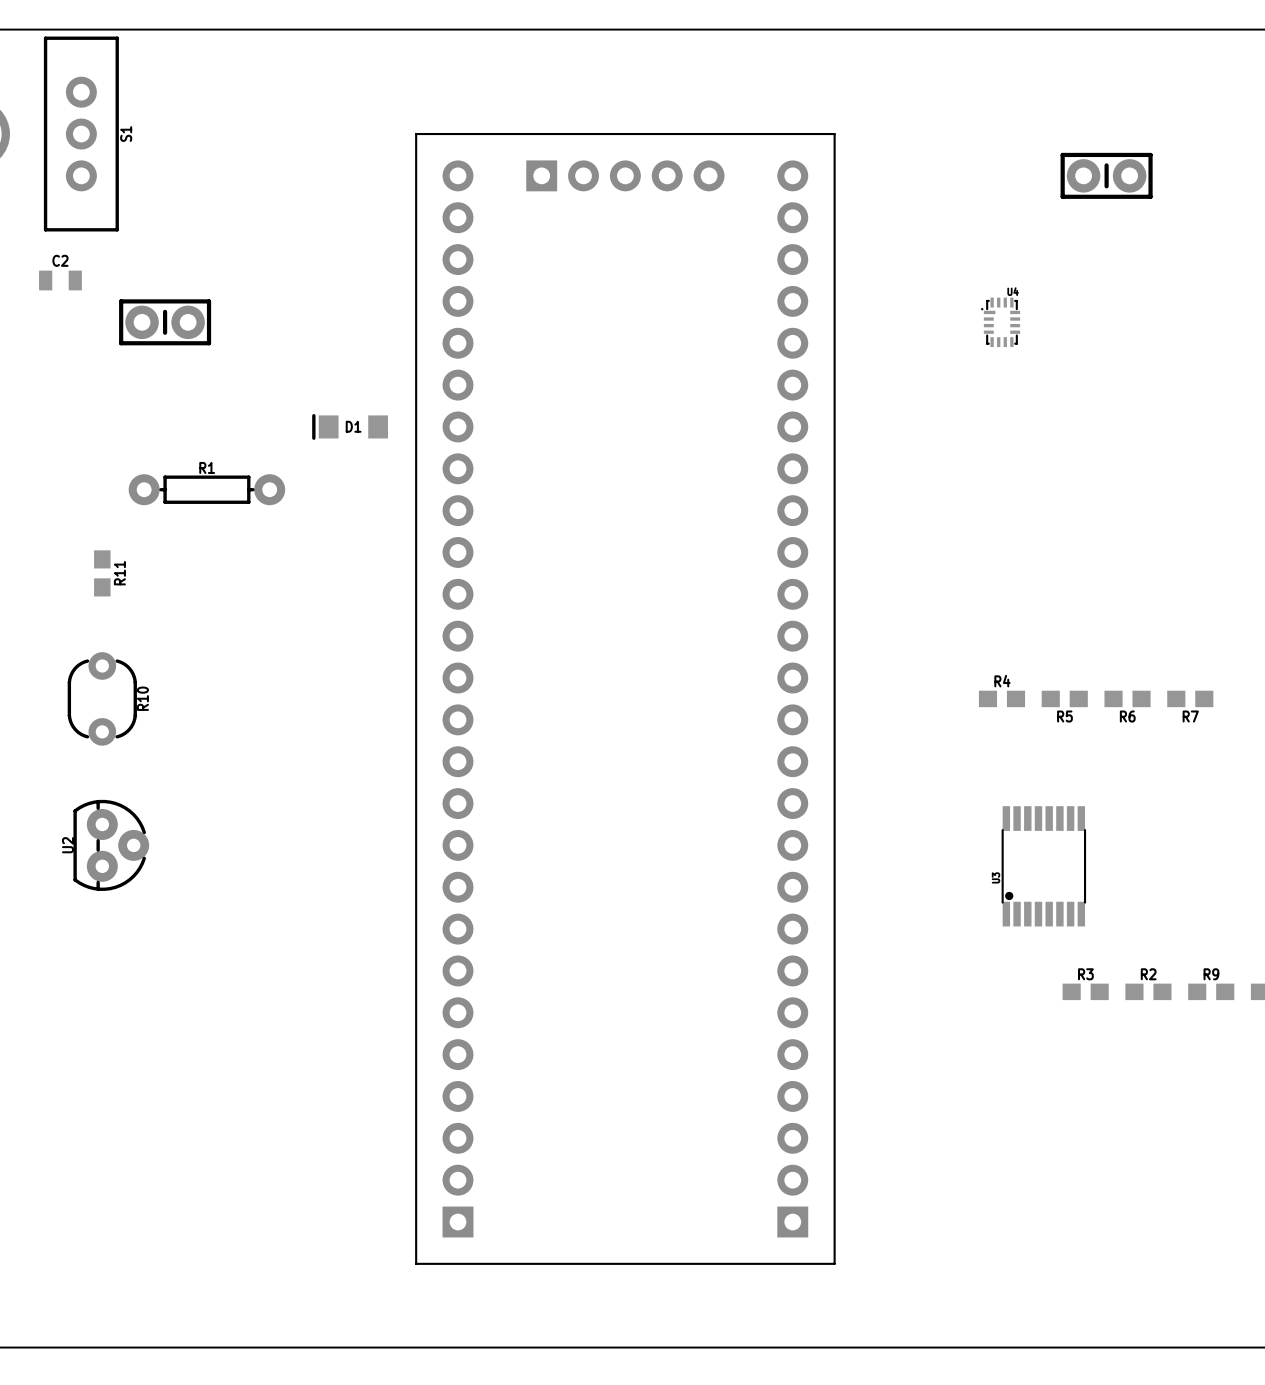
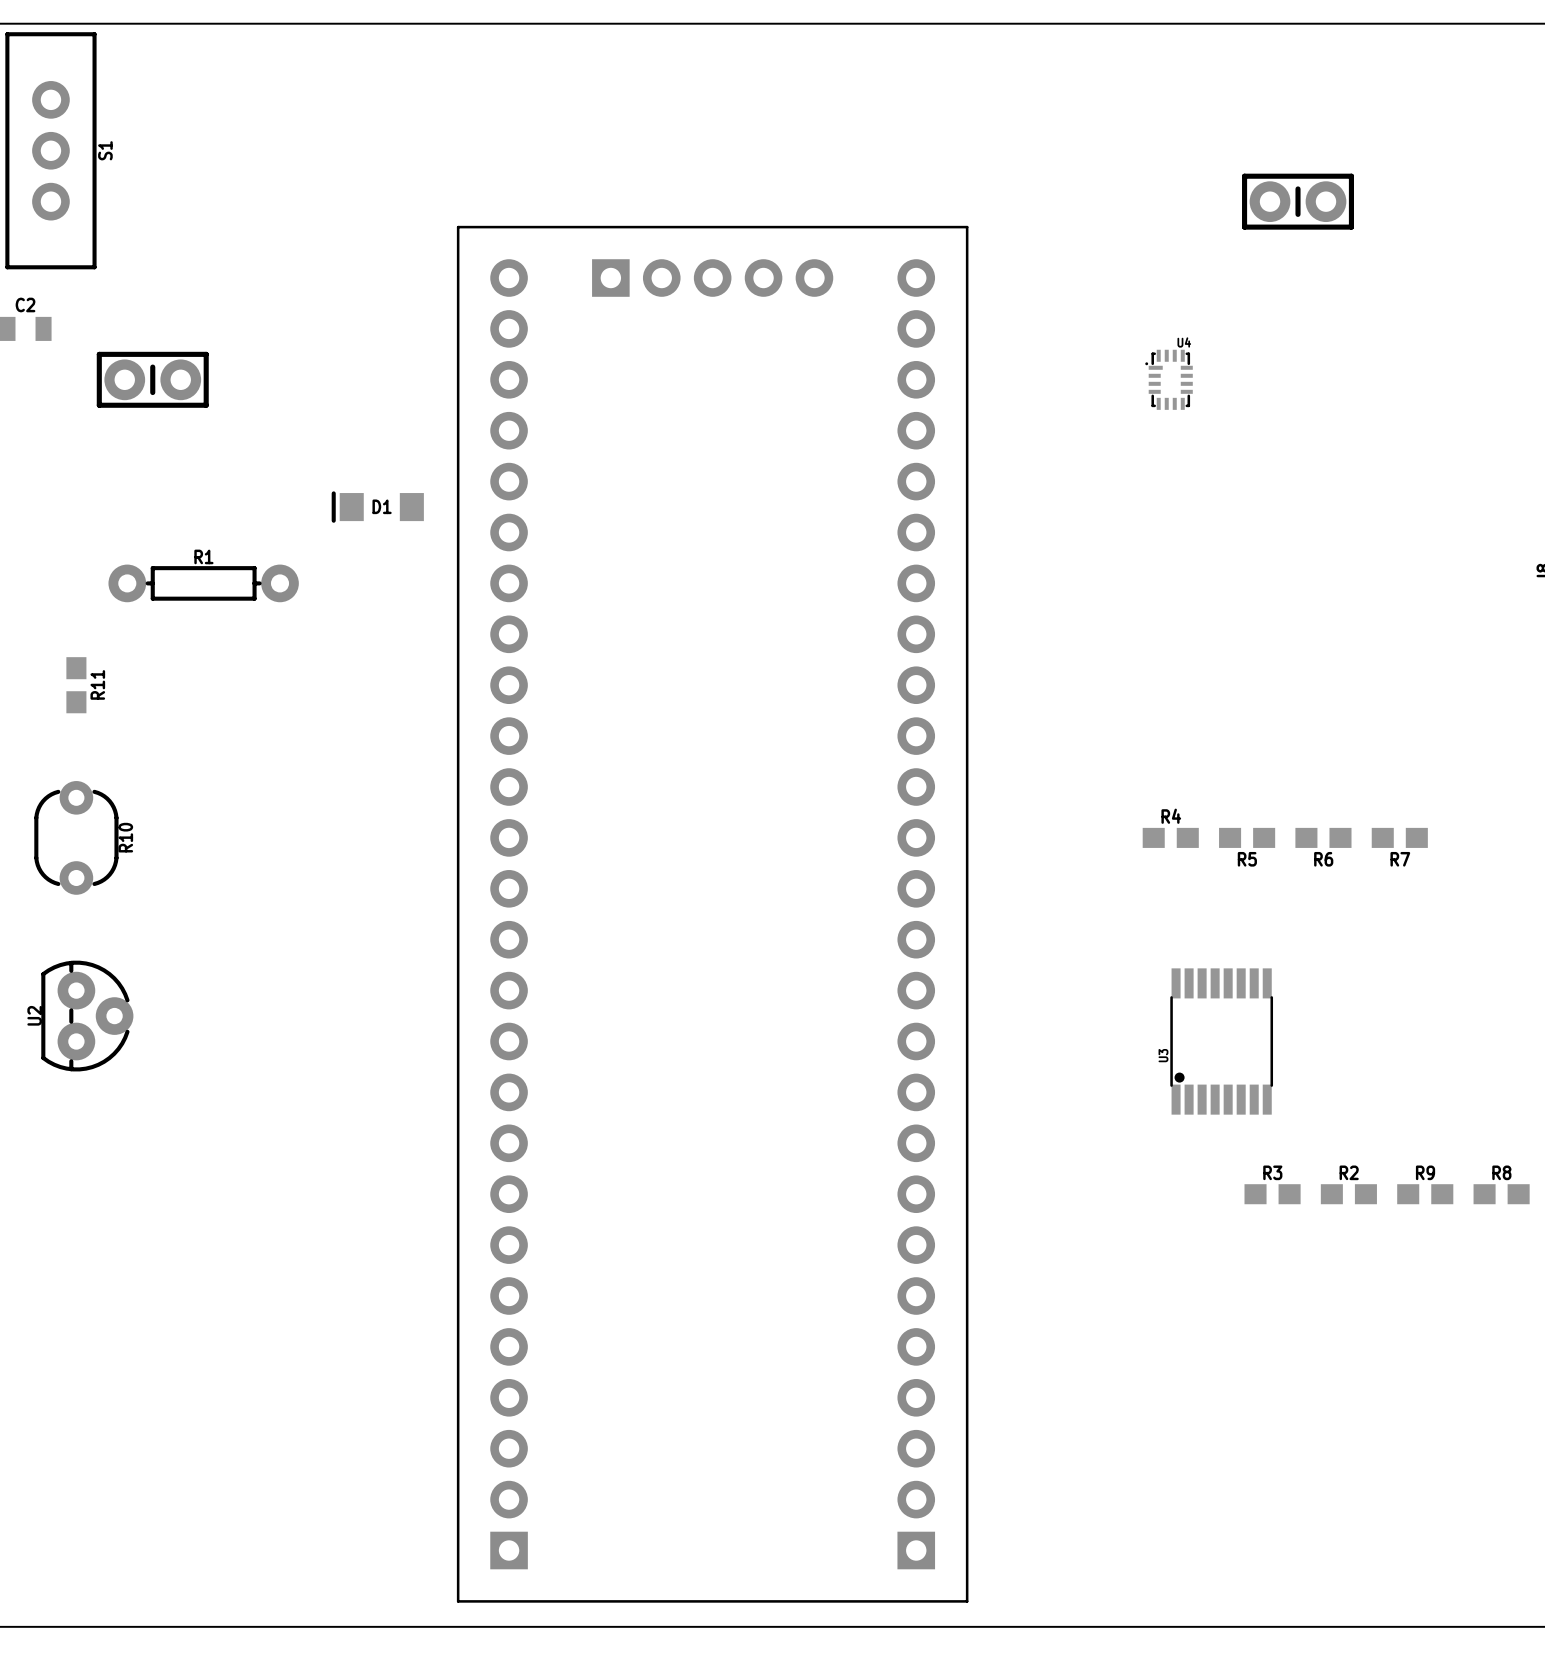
part position: (625, 698) -> (712, 914)

